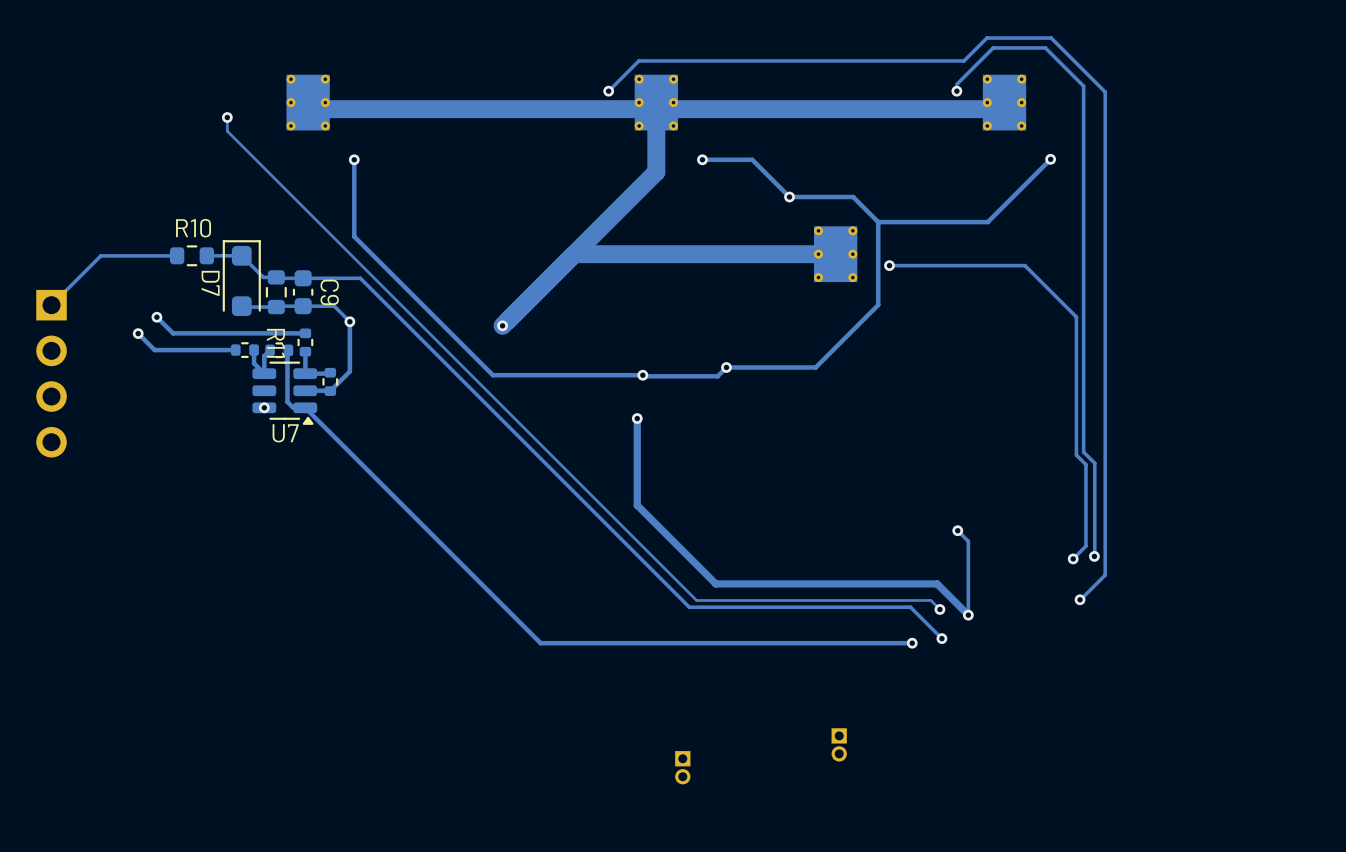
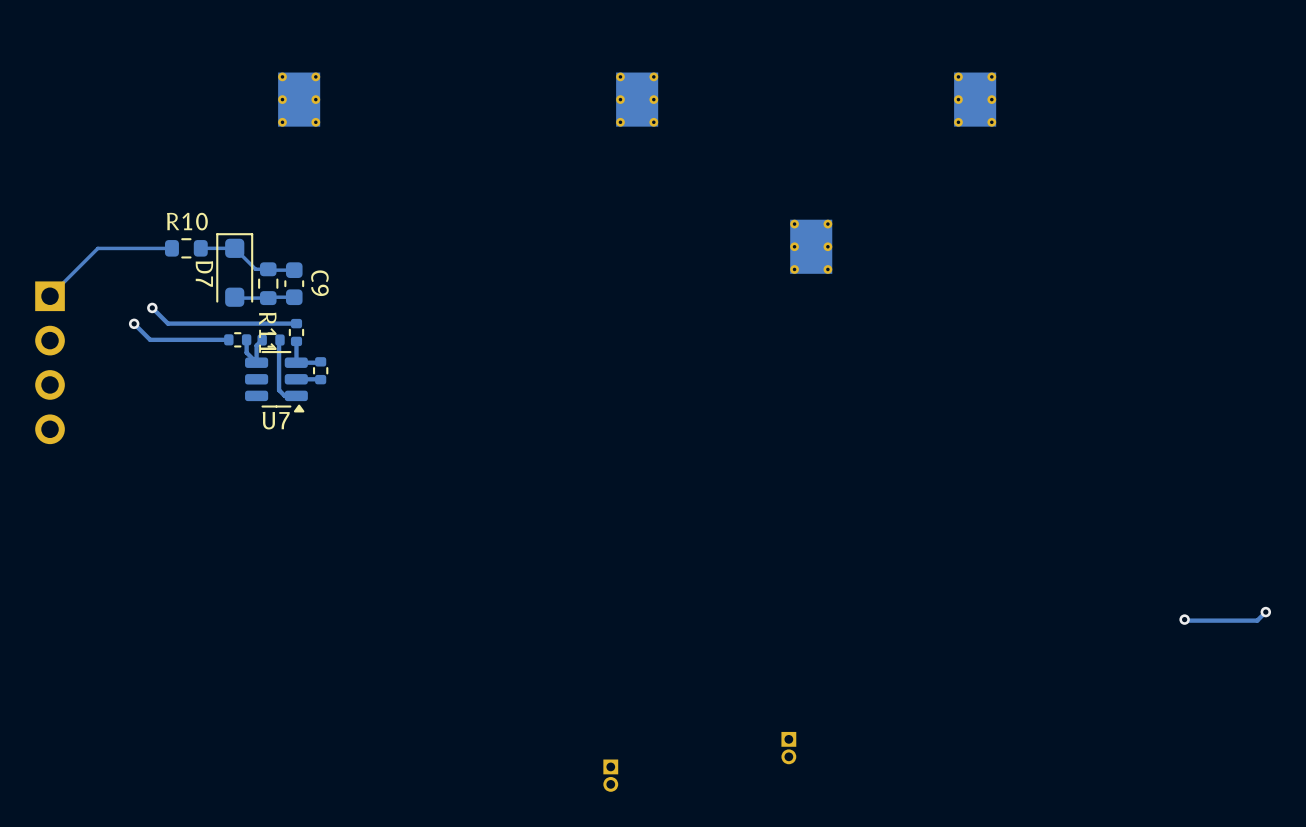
track: (608, 91) (638, 60) (964, 60) (986, 38) (1051, 38) (1105, 92) (1105, 575) (1080, 599) -> none
via: (608, 91) -> none
track: (956, 91) (956, 84) (993, 47) (1045, 47) (1083, 86) (1083, 452) (1094, 463) (1094, 556) -> none
via: (956, 91) -> none
track: (656, 102) (649, 109) (314, 109) (308, 102) -> none
track: (656, 102) (656, 172) (502, 325) -> none
track: (1004, 102) (997, 109) (662, 109) (656, 102) -> none
track: (227, 117) (227, 131) (696, 600) (930, 600) (939, 609) -> none
via: (227, 117) -> none
track: (354, 159) (354, 236) (492, 375) (717, 376) (726, 367) (815, 367) (878, 305) (878, 222) -> none
via: (354, 159) -> none
track: (702, 159) (752, 159) (789, 197) (853, 197) (878, 222) -> none
via: (702, 159) -> none
track: (1050, 159) (987, 222) (878, 222) -> none
via: (1050, 159) -> none
via: (789, 197) -> none
track: (835, 254) (574, 254) -> none
track: (889, 265) (1025, 265) (1076, 317) (1076, 455) (1085, 464) (1085, 546) (1073, 558) -> none
via: (889, 265) -> none
track: (303, 278) (360, 278) (689, 607) (910, 607) (941, 638) -> none
track: (303, 306) (334, 306) (349, 321) (349, 371) (330, 391) -> none
via: (349, 321) -> none
via: (502, 325) -> none
via: (726, 367) -> none
via: (642, 375) -> none
via: (264, 407) -> none
track: (305, 407) (540, 643) (912, 643) -> none
track: (637, 418) (637, 505) (715, 583) (937, 583) (968, 615) (968, 541) (957, 530) -> none
via: (637, 418) -> none
via: (957, 530) -> none
via: (1094, 556) -> none
via: (1073, 558) -> none
via: (1080, 599) -> none
via: (939, 609) -> none
via: (968, 615) -> none
track: none -> (1265, 612) (1257, 620) (1184, 619)
via: none -> (1265, 612)
via: (941, 638) -> none
via: none -> (1184, 619)
via: (912, 643) -> none
part position: (839, 744) -> (788, 748)
part position: (682, 767) -> (610, 775)

